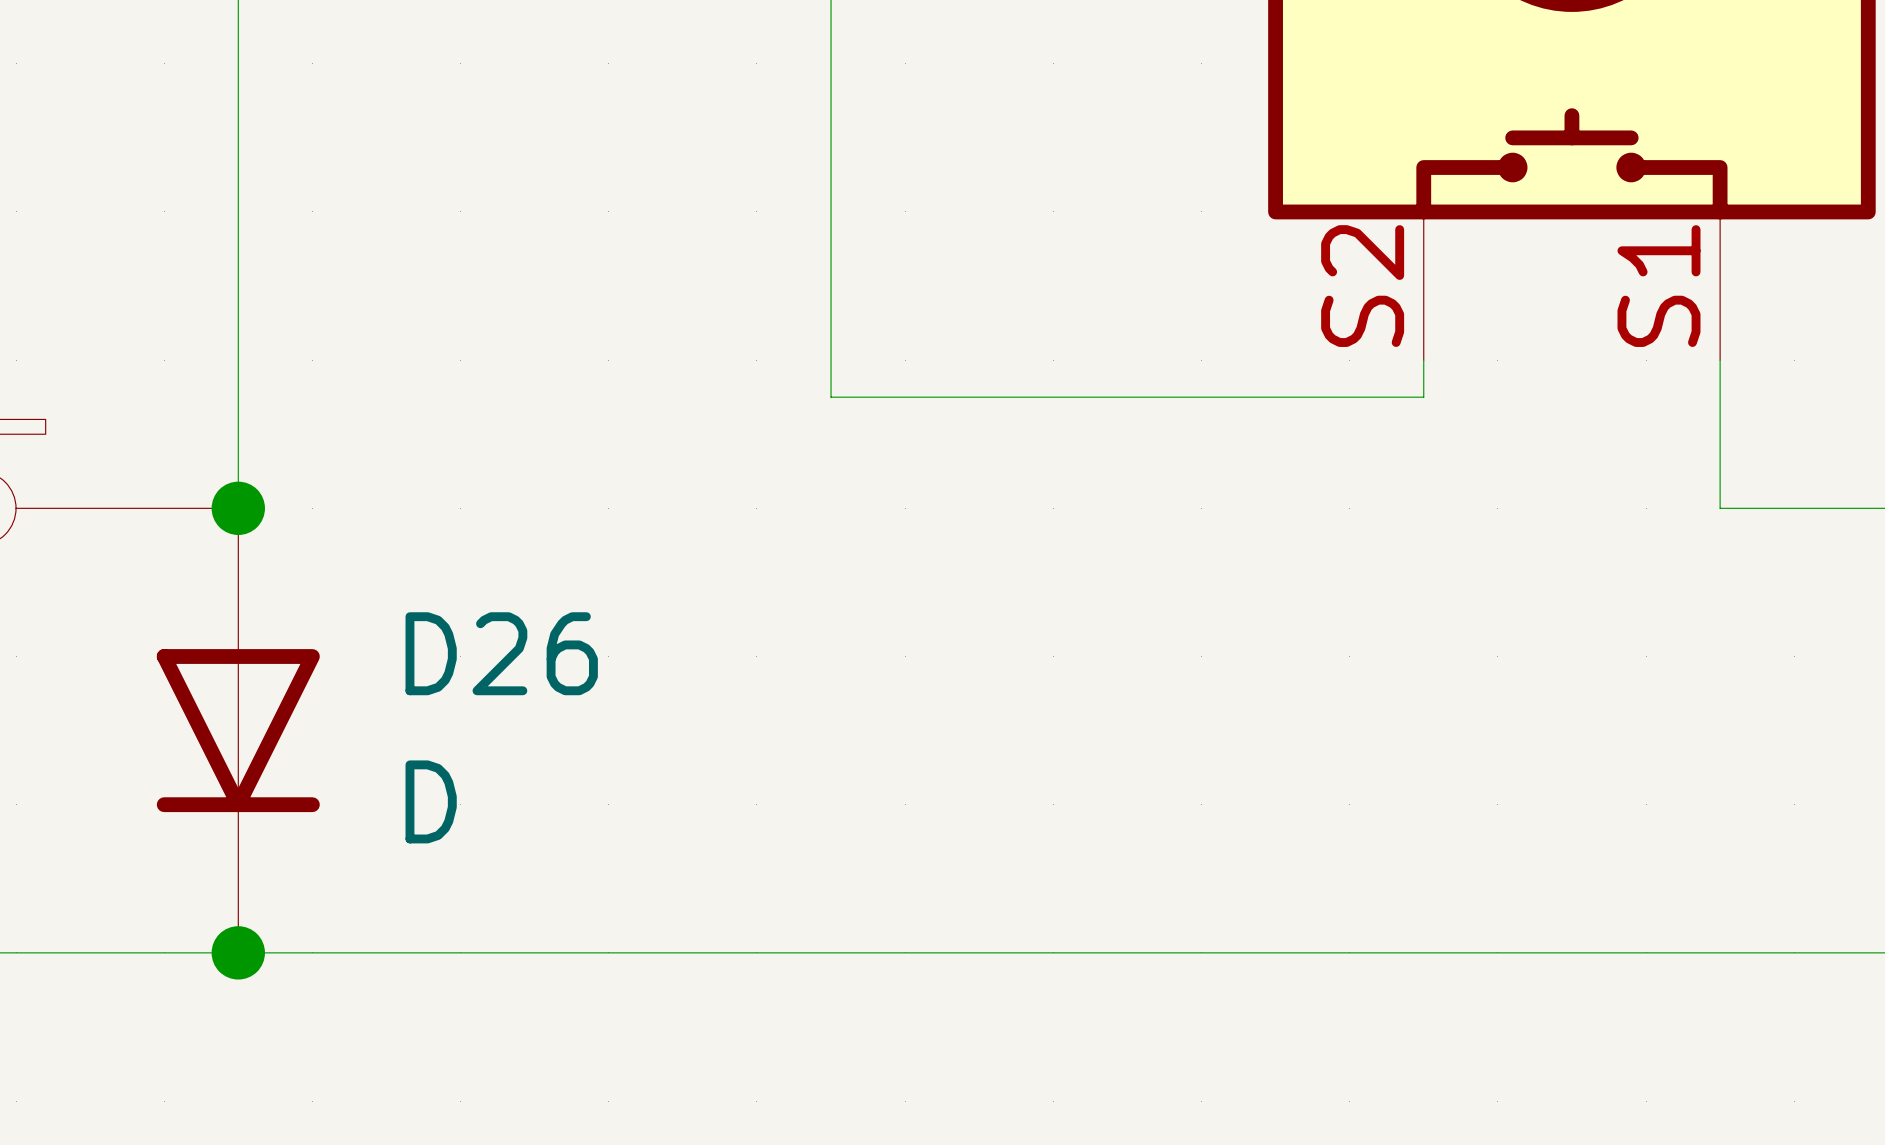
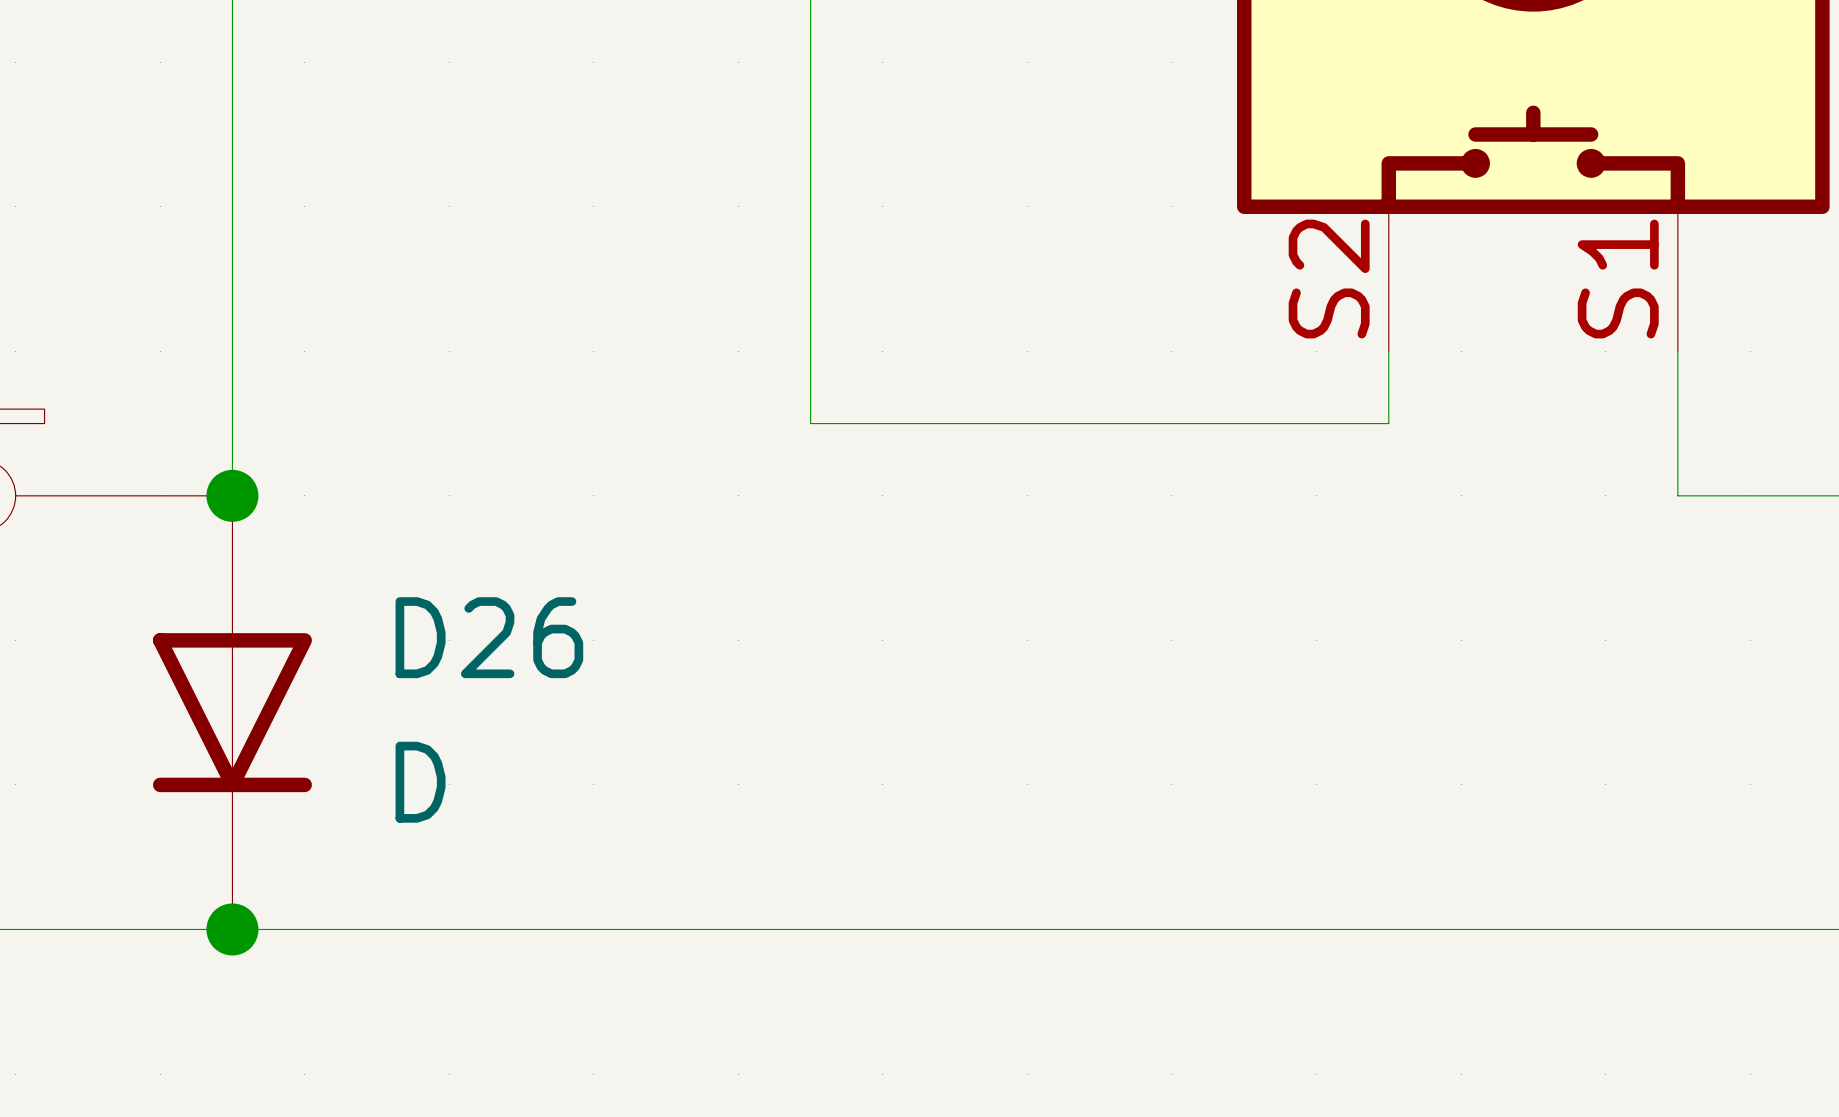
wire: (831, 397) (1423, 397) -> (810, 387) (810, 423) (1388, 423) (1388, 387)

